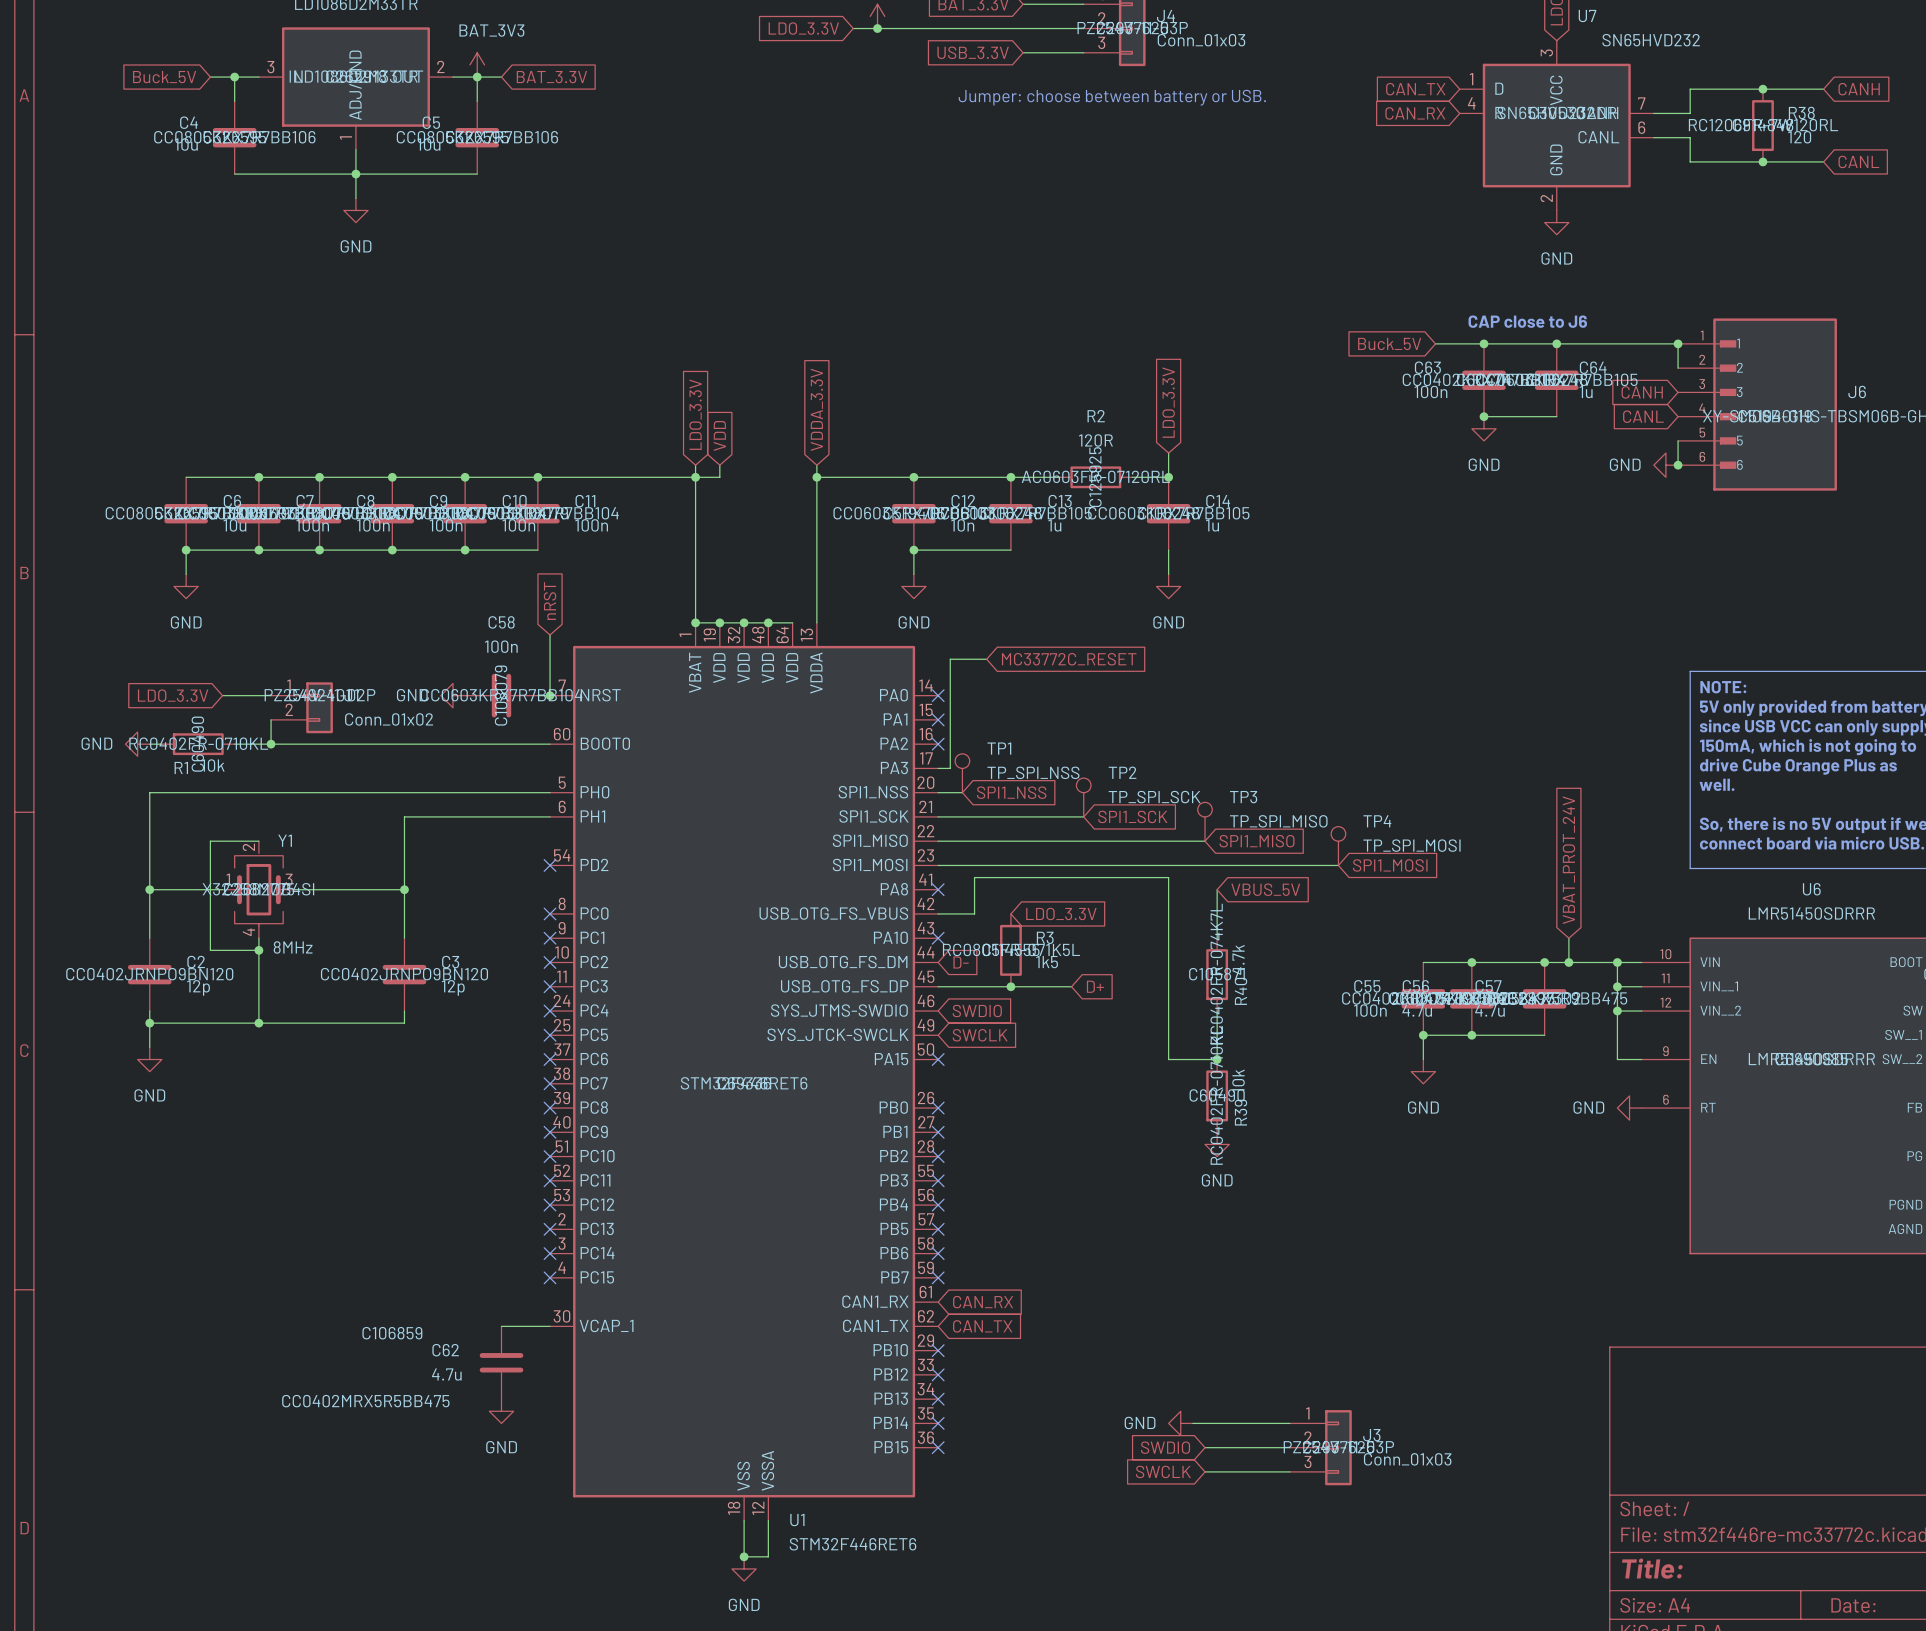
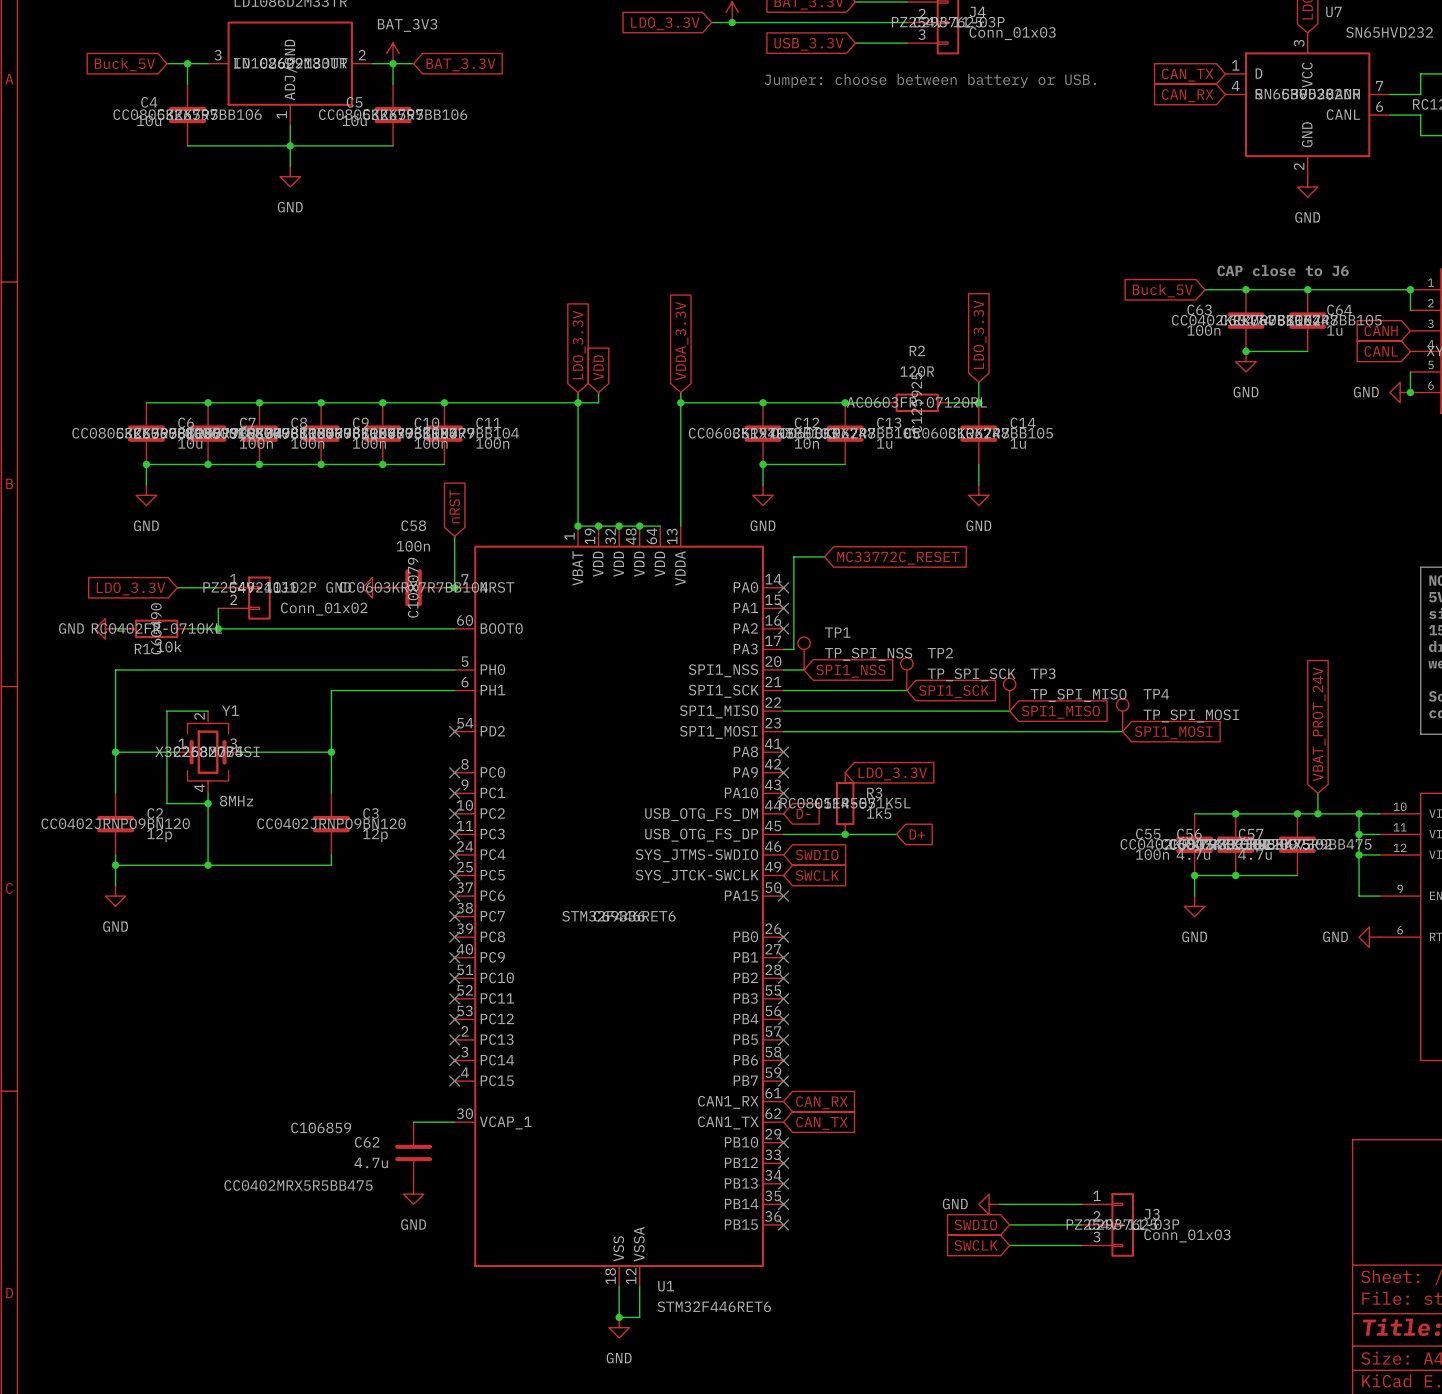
wire: (1217, 889) (1217, 938) -> none
global label: VBUS_5V (1265, 889) -> none
U1 pin name: USB_OTG_FS_VBUS (833, 913) -> PA9 (745, 772)
wire: (938, 913) (974, 913) (974, 877) (1168, 877) (1168, 1059) (1217, 1059) (1217, 1011) -> none
no-connect mark: none -> (783, 772)
R40: 4.7k (1217, 974) -> none
junction: (1217, 1059) -> none
R39: 10k (1217, 1095) -> none
power symbol: GND (1217, 1144) -> none

